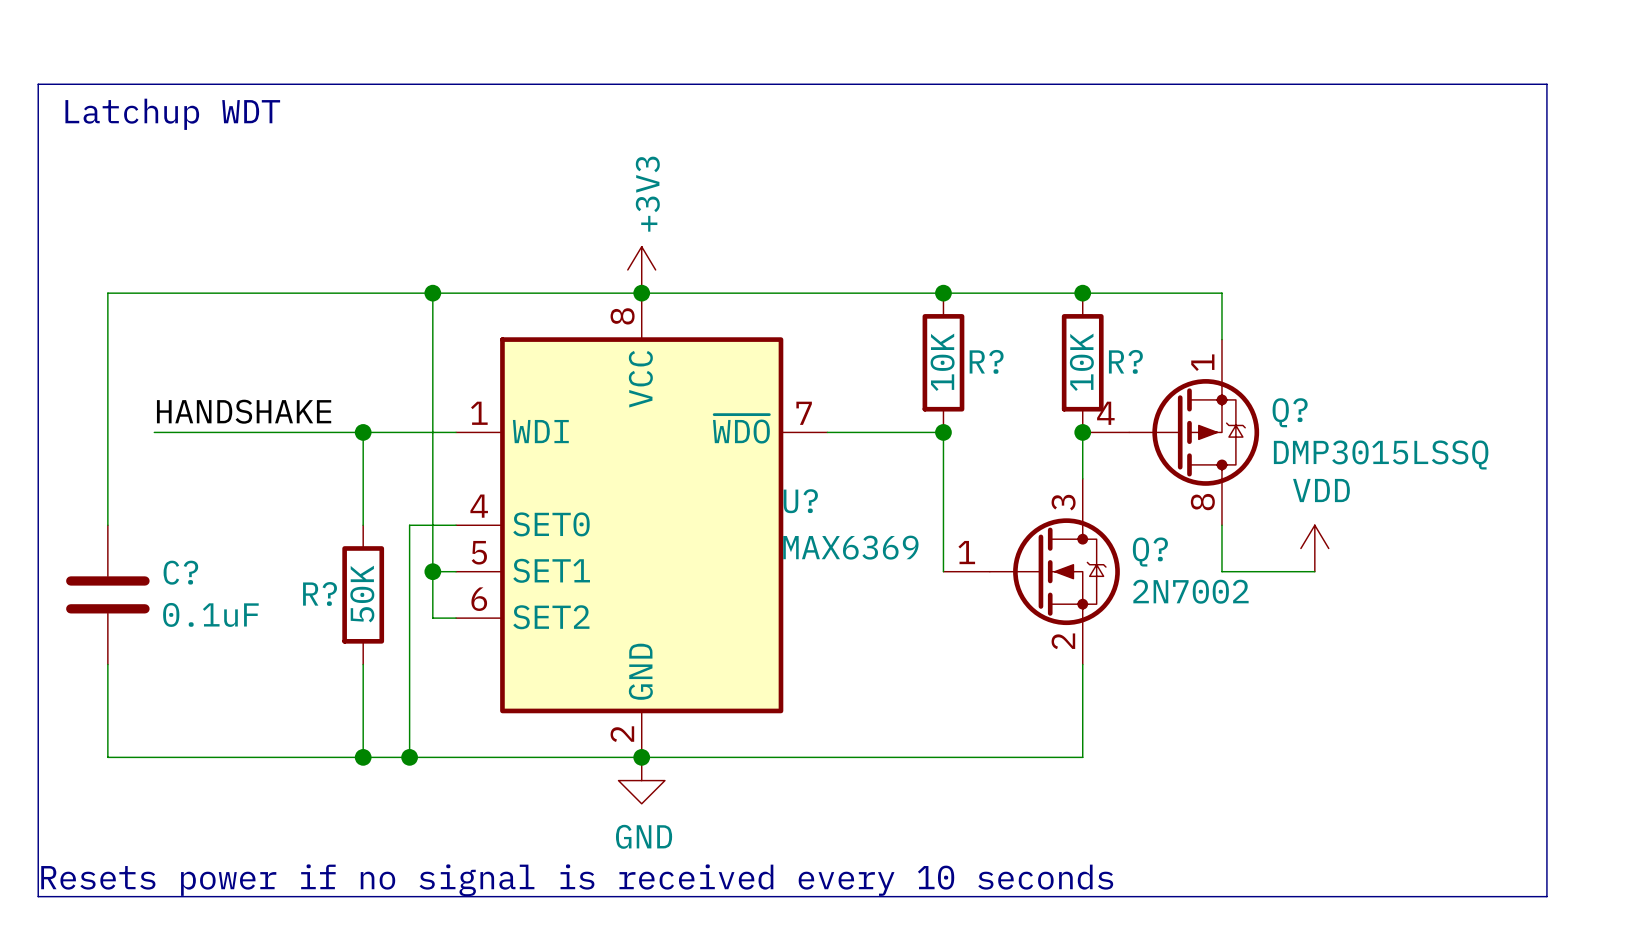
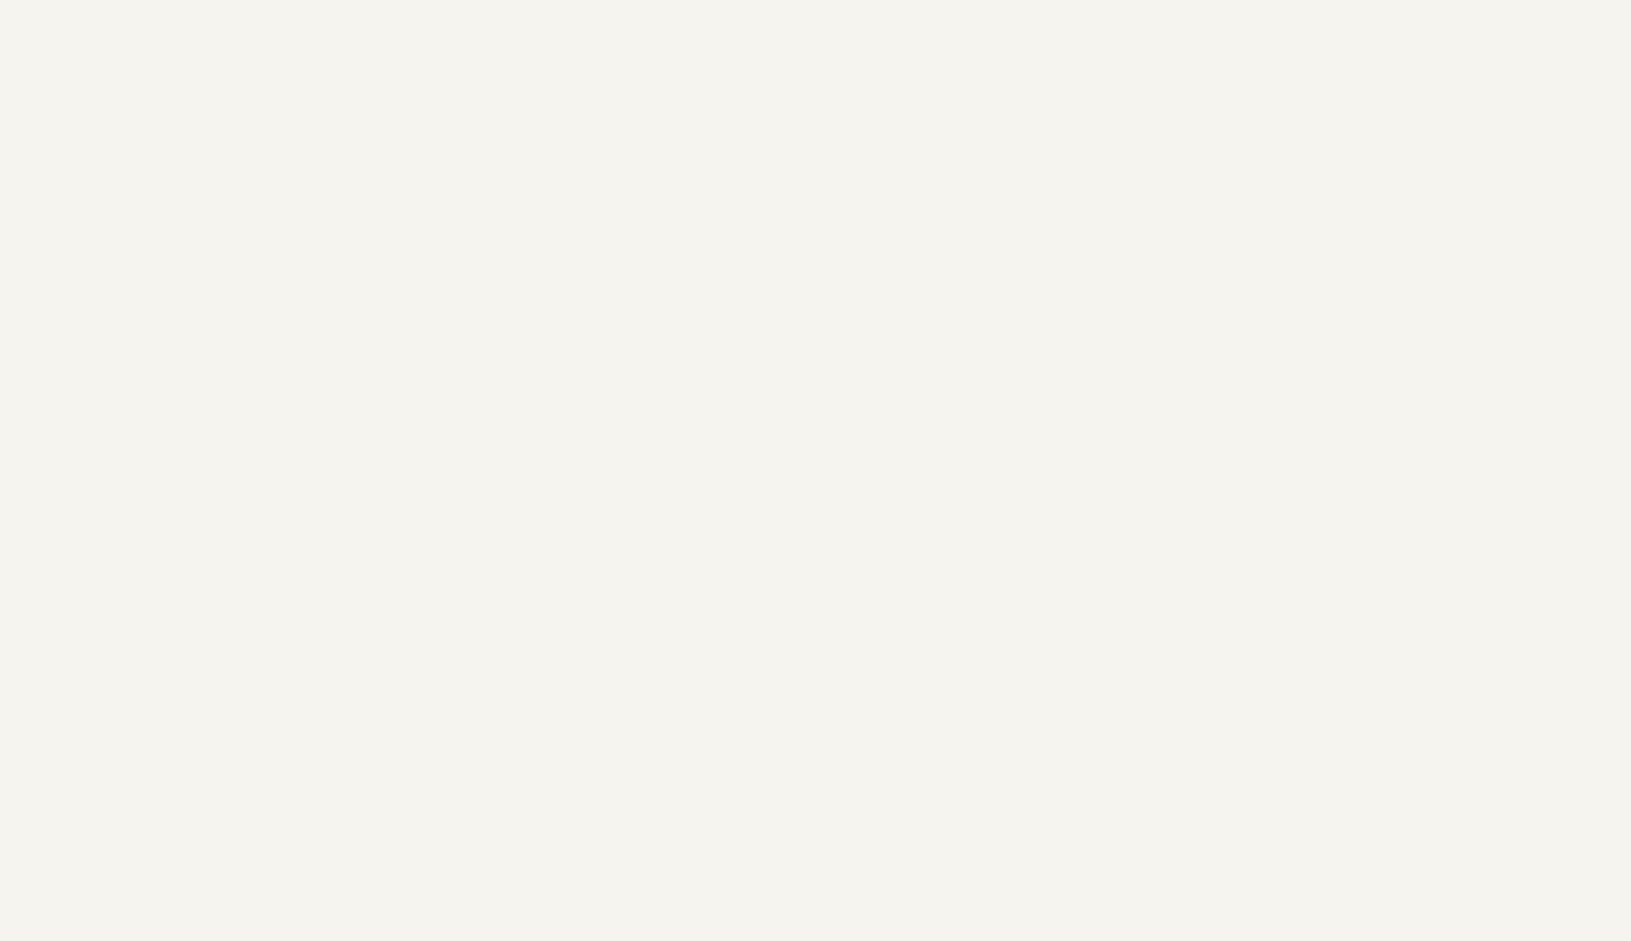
line: (38, 84) (1546, 84) (1546, 896) (38, 896) (38, 84) -> none
text: Latchup WDT (172, 114) -> none
power symbol: +3V3 (641, 269) -> none
wire: (432, 293) (432, 618) (456, 618) -> none
junction: (432, 293) -> none
junction: (641, 293) -> none
junction: (943, 293) -> none
junction: (1082, 293) -> none
wire: (1221, 339) (1221, 293) (107, 293) (107, 525) -> none
R?: 10K (943, 362) -> none
R?: 10K (1082, 362) -> none
label: HANDSHAKE (244, 411) -> none
wire: (154, 432) (456, 432) -> none
wire: (363, 432) (363, 525) -> none
junction: (363, 432) -> none
wire: (827, 432) (943, 432) (943, 571) -> none
junction: (943, 432) -> none
wire: (1082, 432) (1082, 478) -> none
junction: (1082, 432) -> none
Q?: DMP3015LSSQ (1170, 432) -> none
wire: (456, 525) (409, 525) (409, 757) -> none
U?: MAX6369 (641, 525) -> none
wire: (1221, 525) (1221, 571) (1314, 571) -> none
power symbol: VDD (1314, 548) -> none
wire: (432, 571) (456, 571) -> none
junction: (432, 571) -> none
Q?: 2N7002 (1031, 571) -> none
C?: 0.1uF (107, 594) -> none
R?: 50K (363, 594) -> none
wire: (107, 664) (107, 757) (1082, 757) (1082, 664) -> none
wire: (363, 664) (363, 757) -> none
junction: (363, 757) -> none
junction: (409, 757) -> none
junction: (641, 757) -> none
power symbol: GND (641, 780) -> none
text: Resets power if no signal is received every 10 seconds (577, 880) -> none

